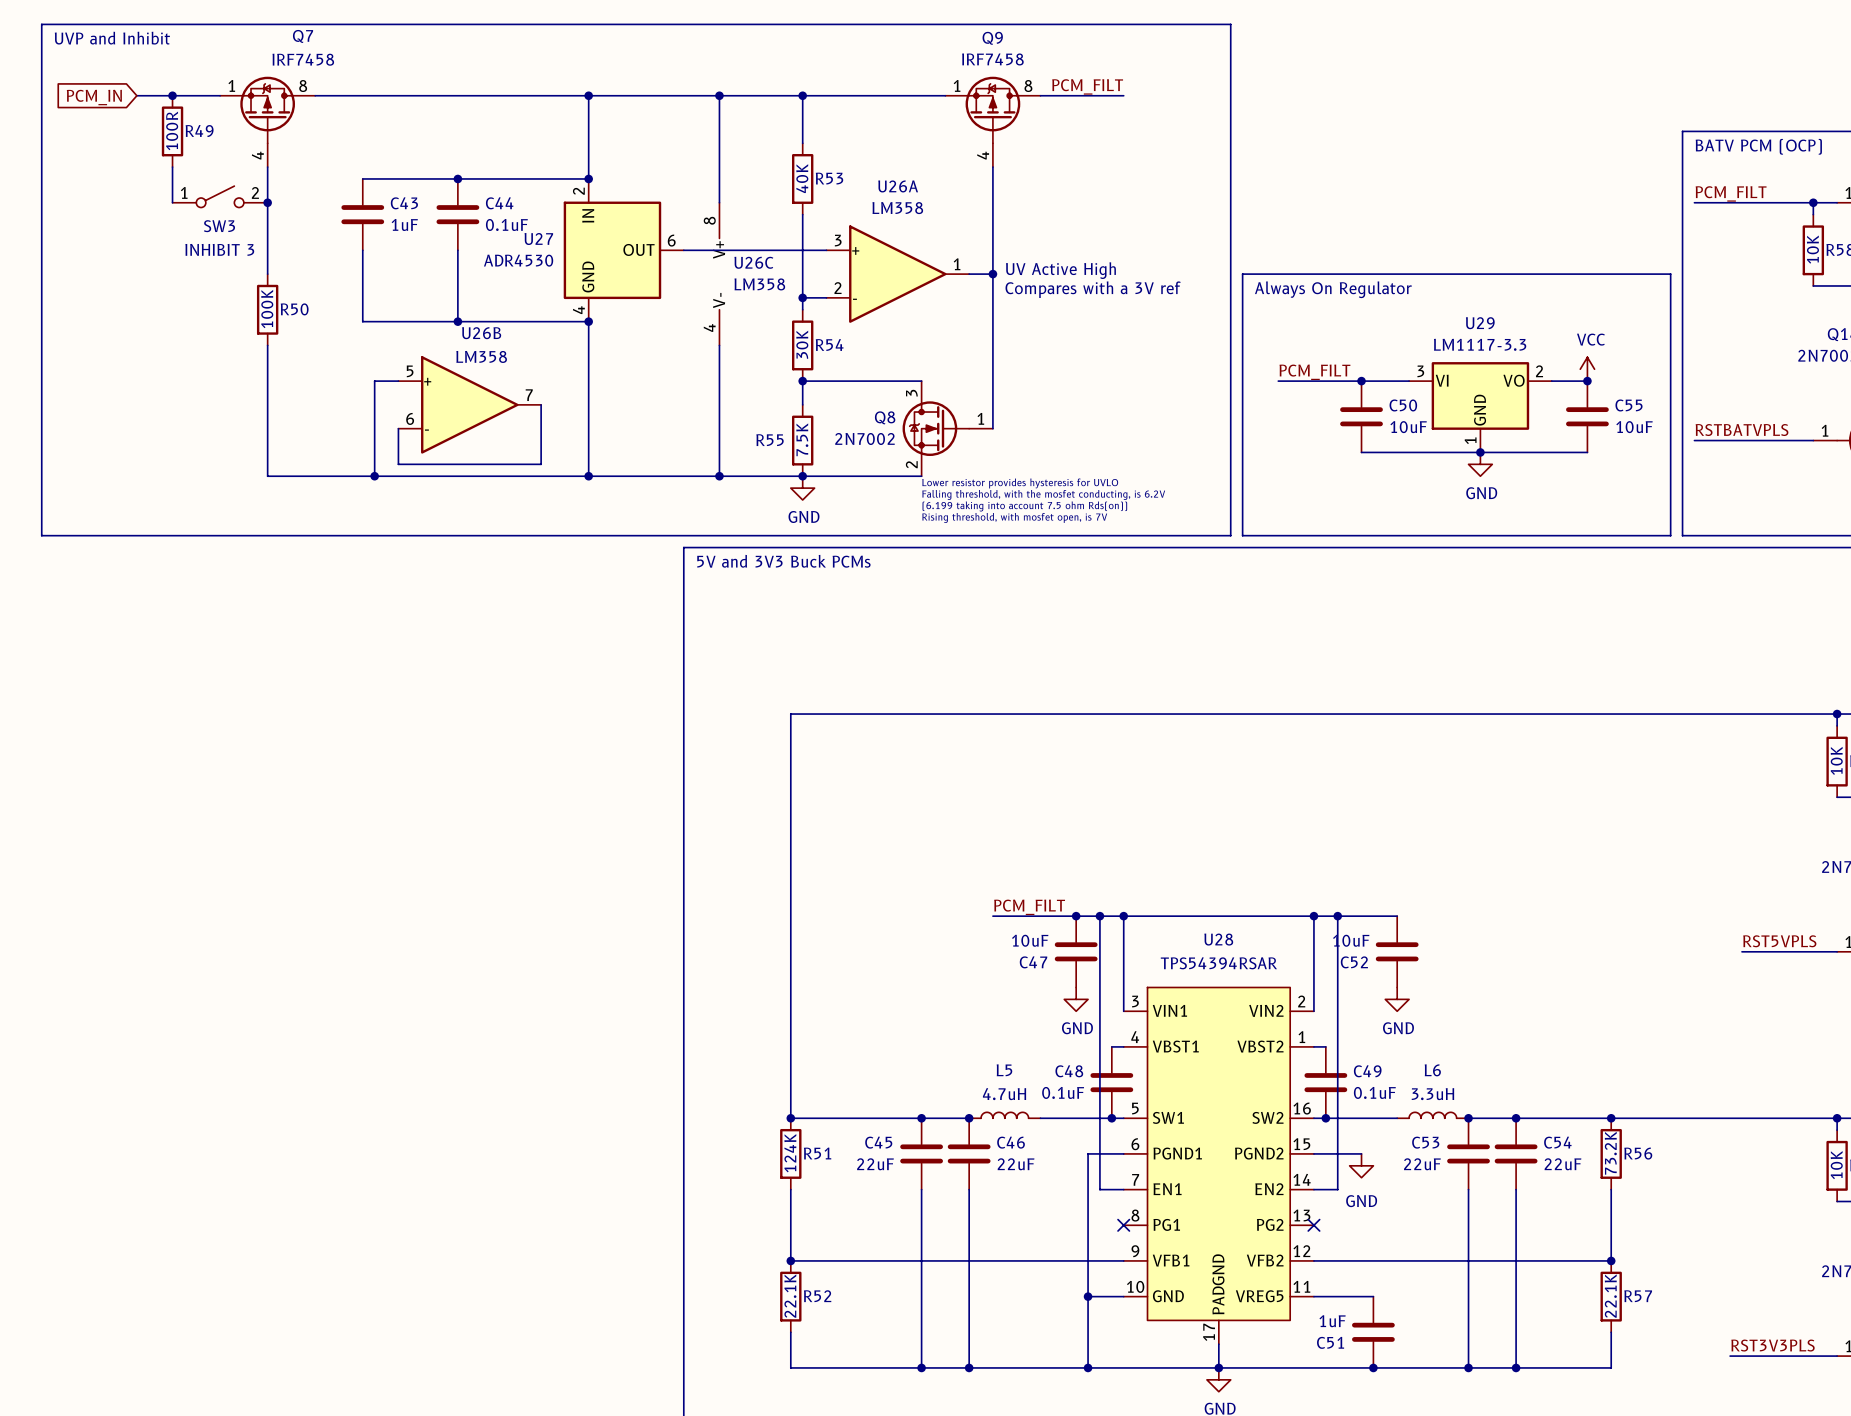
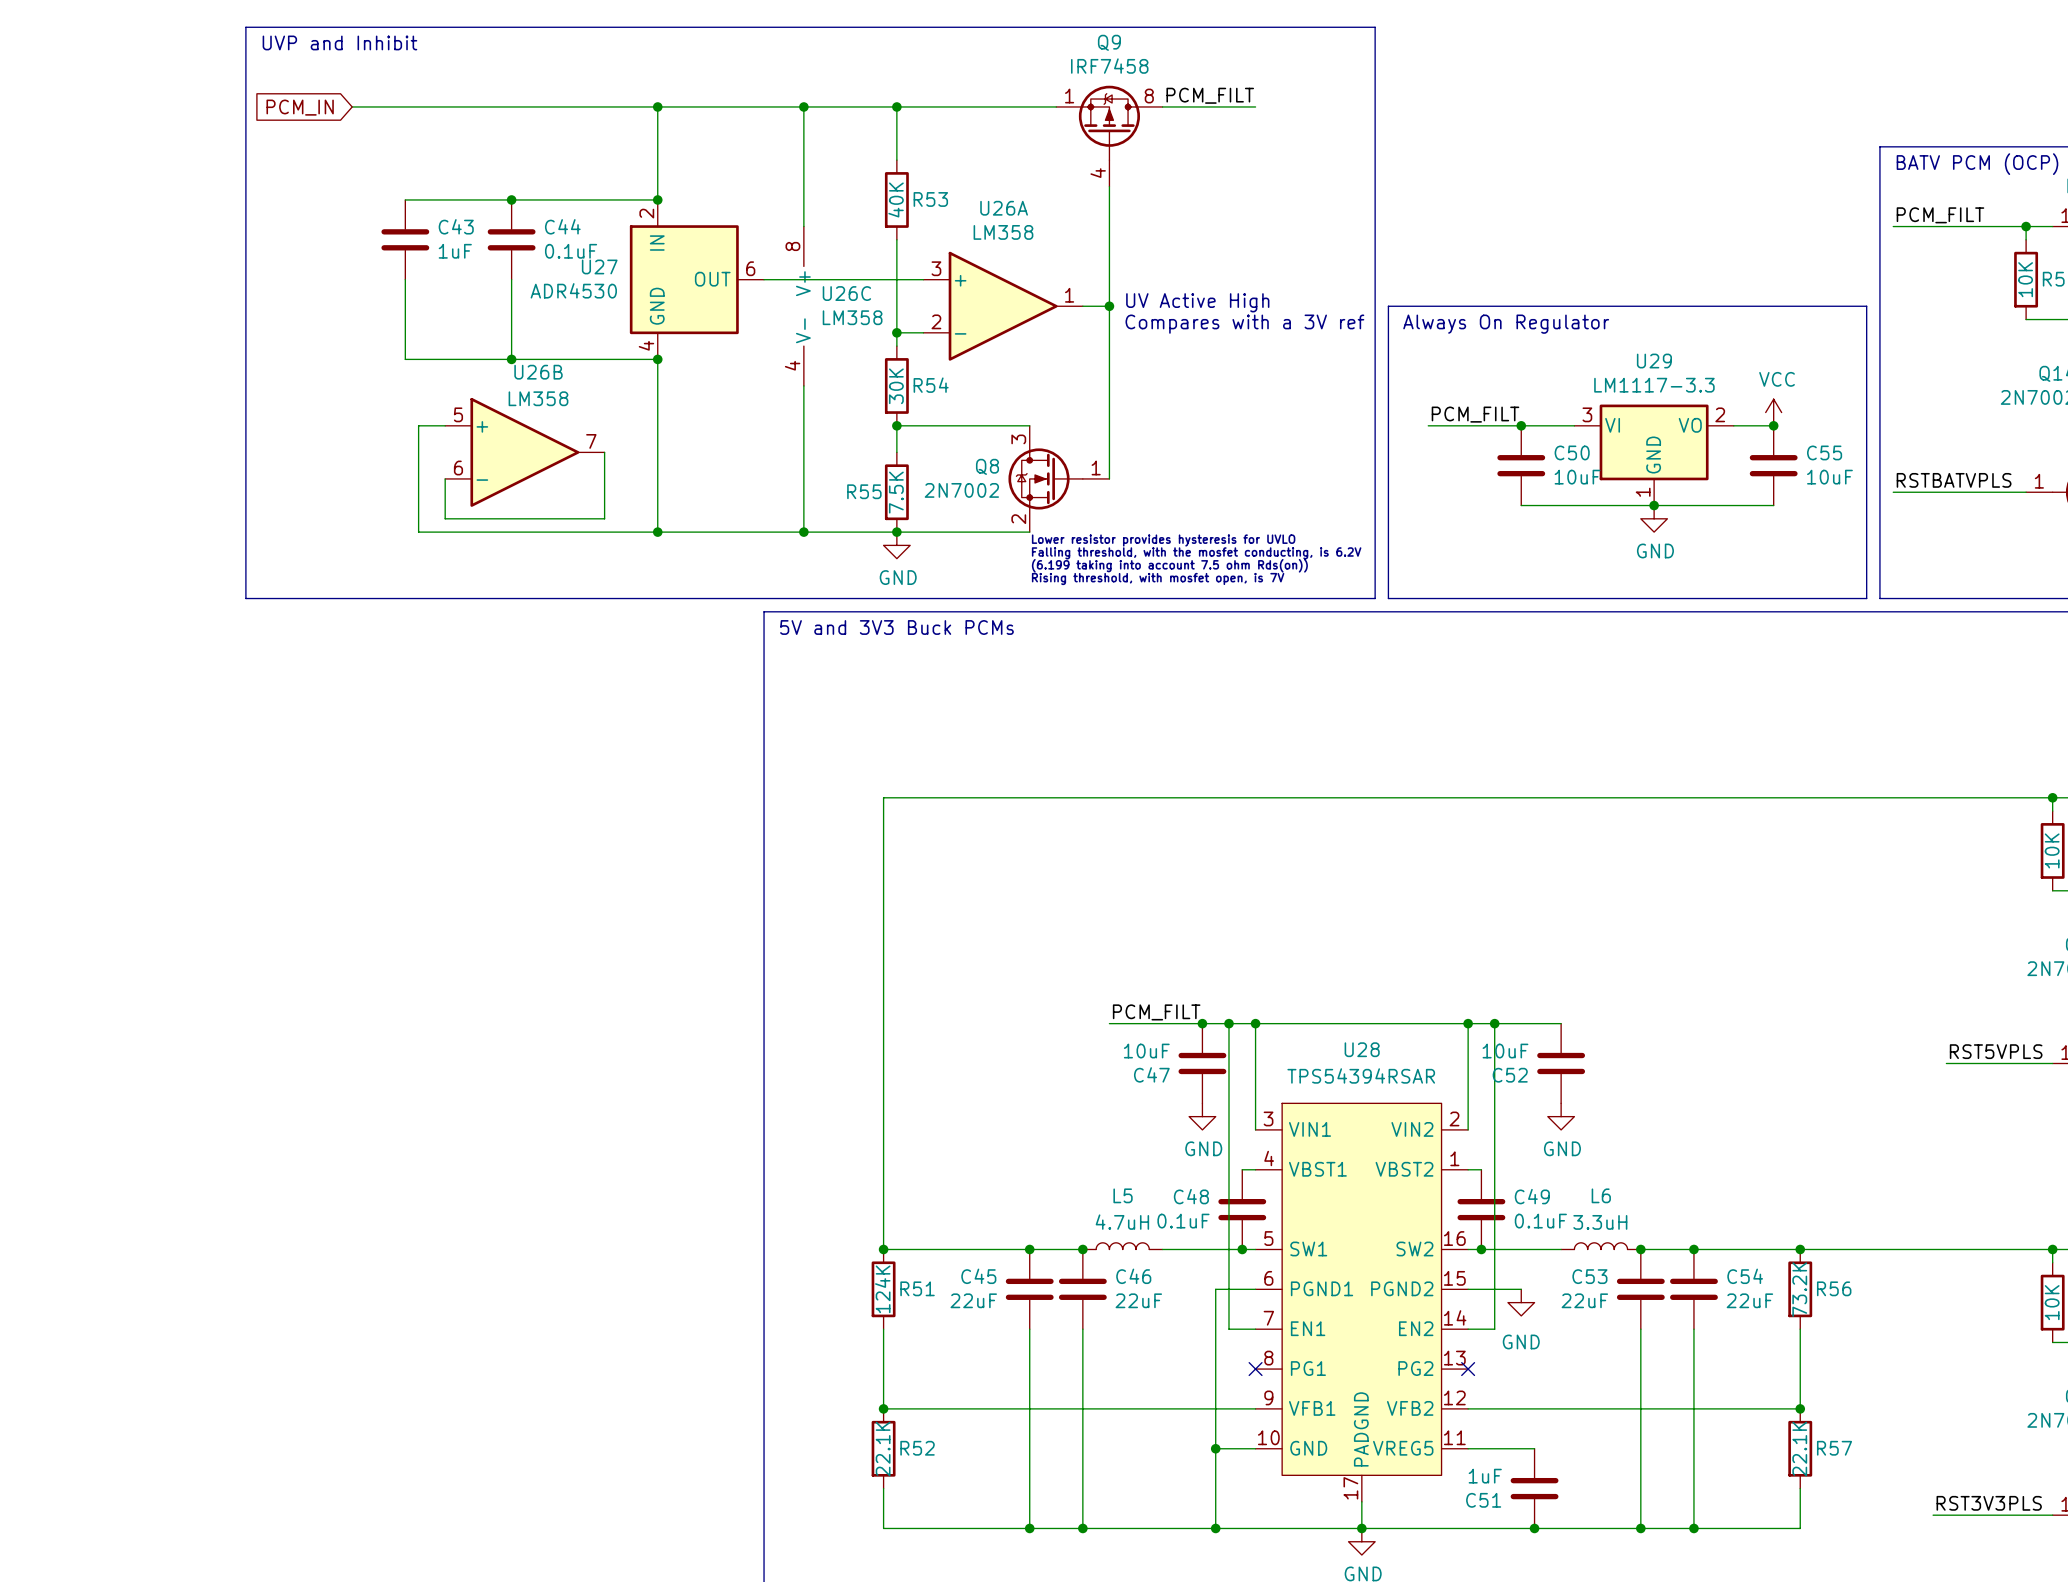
line: (220, 24) (41, 24) (41, 535) (220, 535) -> (245, 27) (245, 598)
text position: UVP and Inhibit (112, 38) -> UVP and Inhibit (339, 42)
wire: (136, 95) (220, 95) -> none
junction: (172, 95) -> none
global label position: PCM_IN (94, 97) -> PCM_IN (300, 107)
Q7: IRF7458 (267, 121) -> none
R49: 100R (172, 131) -> none
wire: (172, 167) (172, 202) -> none
wire: (267, 167) (267, 274) -> none
SW3: INHIBIT 3 (220, 196) -> none
junction: (267, 202) -> none
R50: 100K (267, 309) -> none
wire: (267, 345) (267, 476) (374, 476) -> none
junction: (374, 476) -> none

